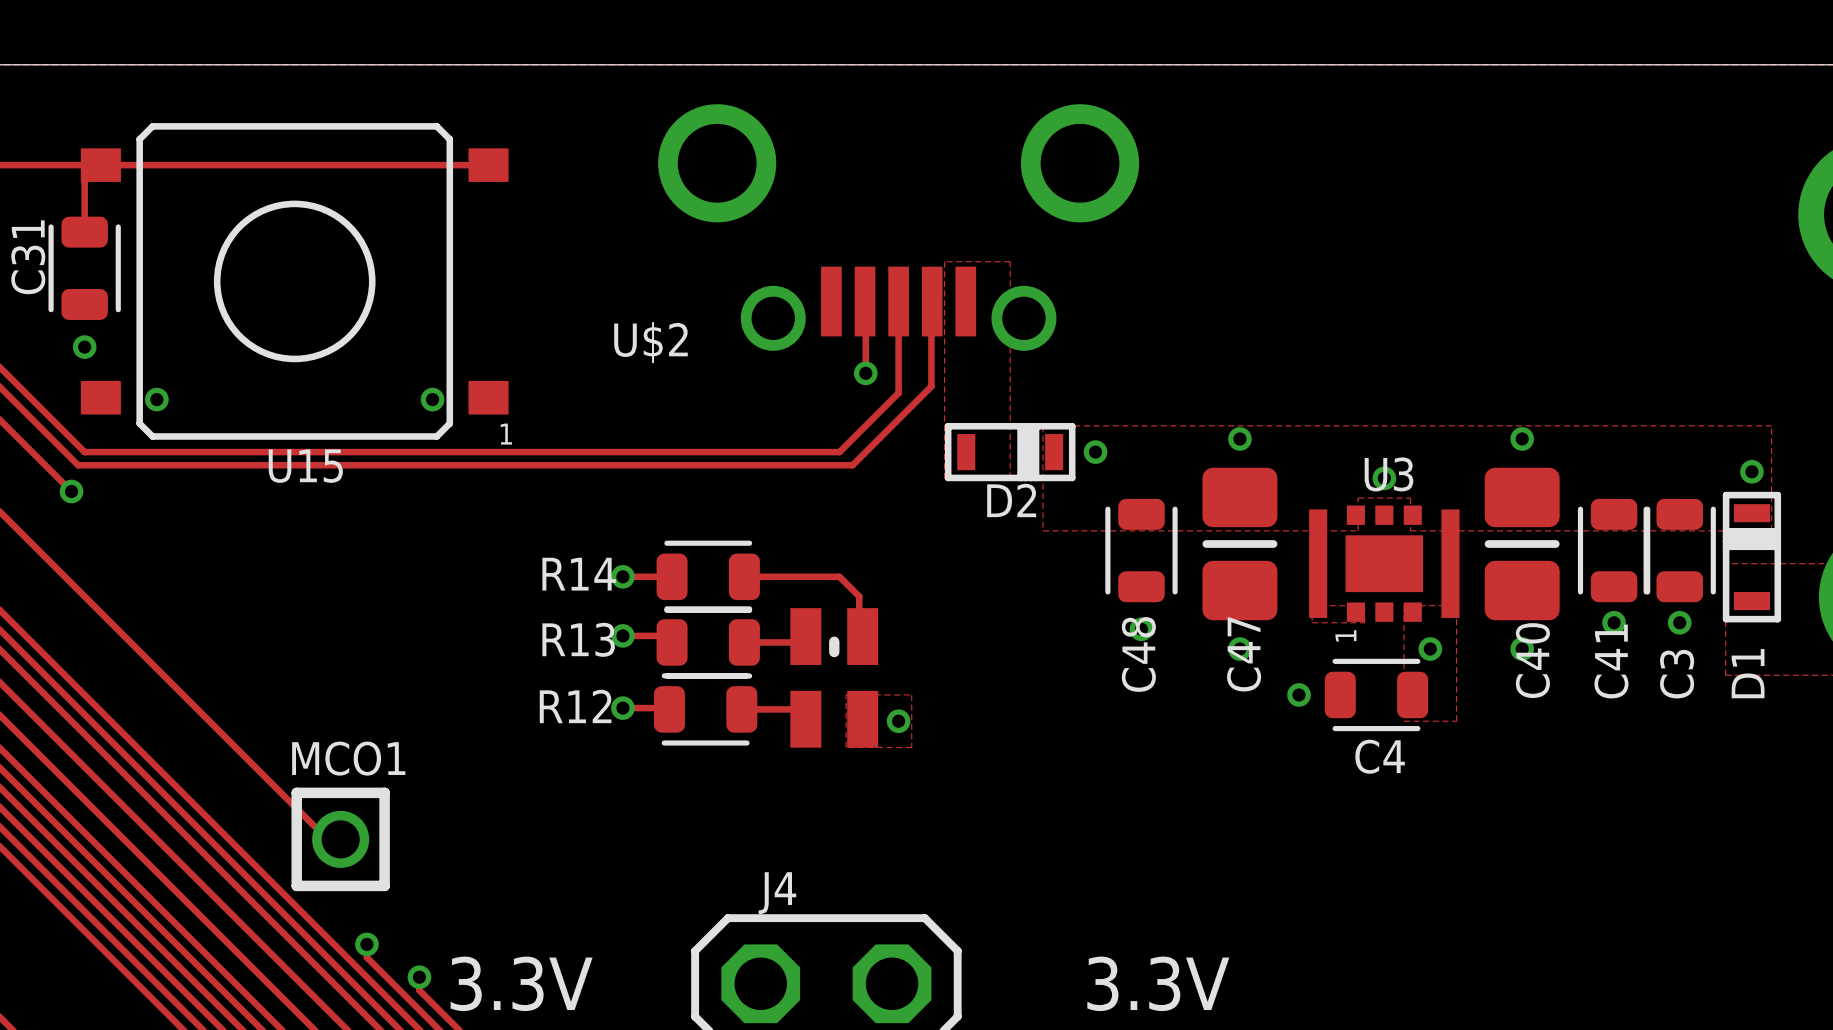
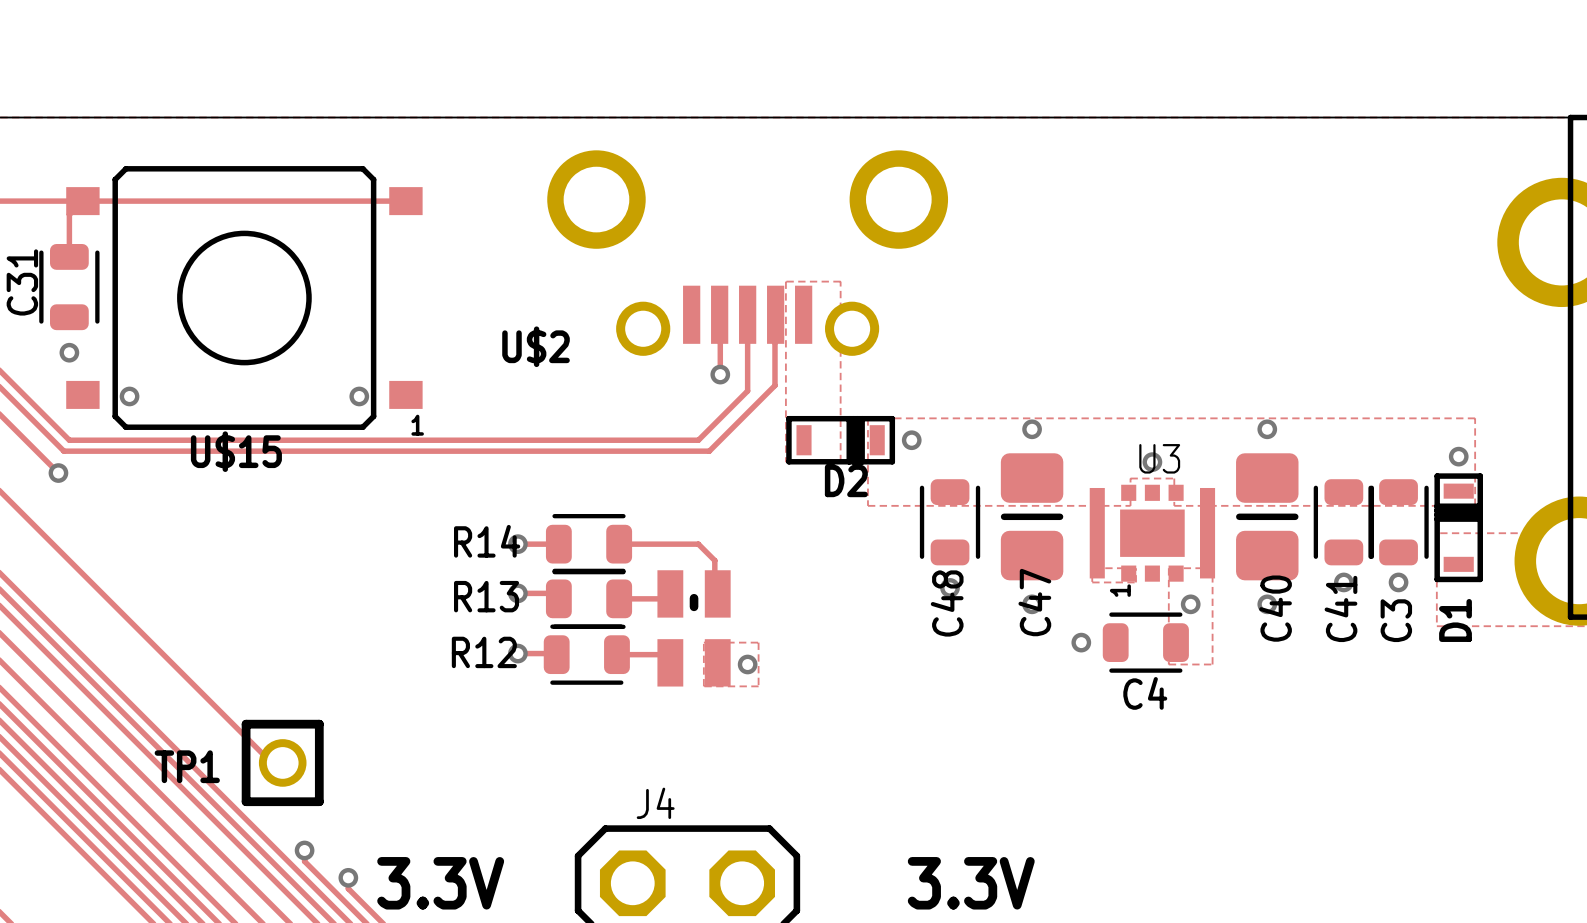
U15 name: U15 (305, 466) -> U$15 (236, 451)
MCO1 name: MCO1 (348, 758) -> TP1 (187, 766)

